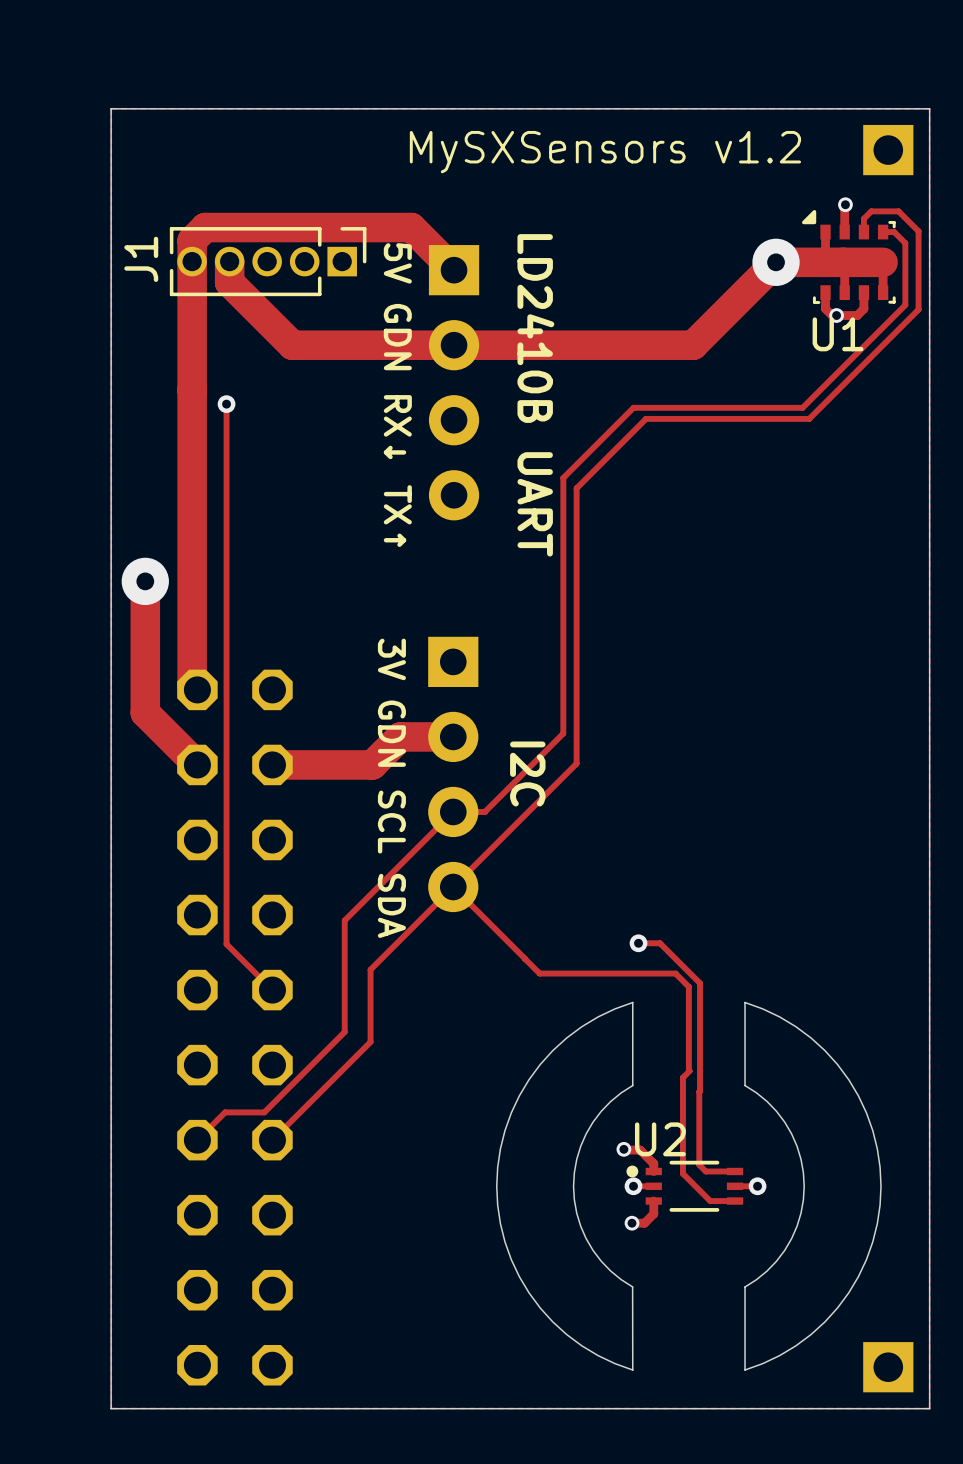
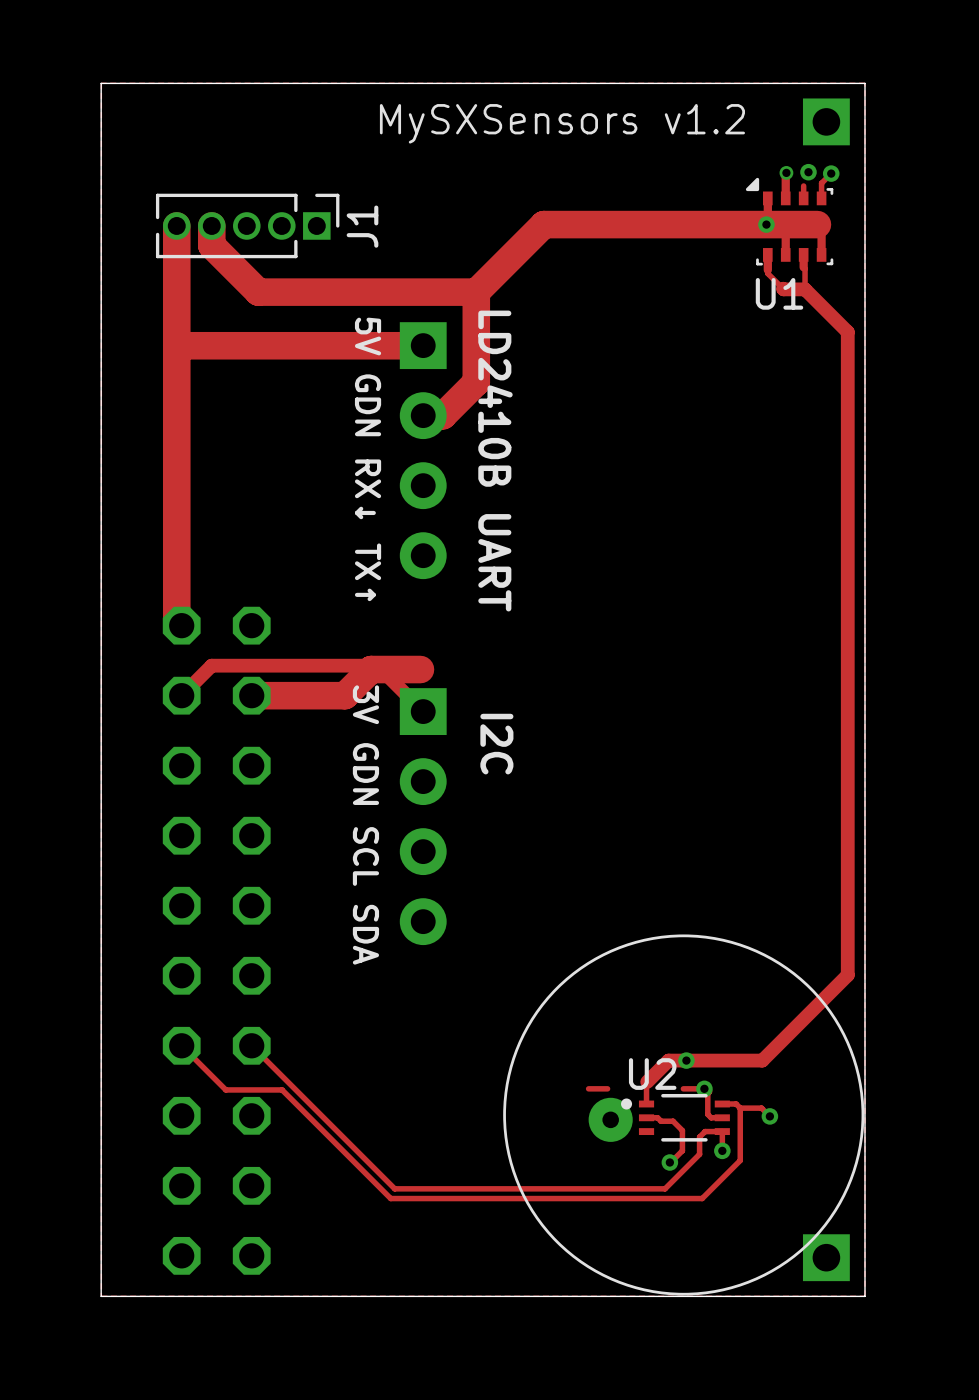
via: none -> (808, 172)
track: none -> (831, 173) (821, 183) (821, 198)
via: none -> (831, 173)
track: (863, 218) (871, 211) (898, 211) (918, 231) (918, 309) (809, 418) (646, 418) (576, 488) (576, 763) (370, 969) (370, 1042) (272, 1140) -> (722, 1150) (722, 1131) (705, 1131) (699, 1137) (699, 1154) (665, 1188) (394, 1188) (251, 1045)
track: (883, 232) (894, 232) (905, 243) (905, 305) (802, 407) (633, 407) (563, 477) (563, 733) (484, 811) (453, 811) (344, 920) (344, 1032) (264, 1112) (225, 1112) (197, 1140) -> (740, 1108) (740, 1160) (702, 1198) (390, 1198) (282, 1089) (225, 1089) (181, 1045)
J1 name position: J1 (141, 259) -> J1 (362, 226)
via: none -> (766, 224)
track: (192, 261) (192, 240) (205, 227) (411, 227) (454, 270) -> none
via: (776, 262) -> none
track: (883, 264) (883, 262) (776, 262) (693, 345) (292, 345) (279, 332) -> (821, 228) (817, 224) (543, 224) (476, 292)
track: (863, 305) (863, 308) (857, 315) (832, 315) (825, 308) -> (805, 289) (783, 289) (767, 273) (767, 270)
track: none -> (803, 267) (805, 289)
via: (836, 315) -> none
track: none -> (805, 289) (847, 332) (847, 975) (762, 1060) (668, 1060) (646, 1082) (646, 1104)
track: none -> (258, 292) (476, 292)
track: none -> (476, 292) (476, 382) (442, 415) (421, 415)
part position: (454, 382) -> (423, 450)
track: none -> (423, 345) (176, 345)
text position: 5V GDN RX↓ TX↑ (397, 395) -> 5V GDN RX↓ TX↑ (368, 459)
text position: LD2410B UART (535, 395) -> LD2410B UART (495, 461)
track: (226, 404) (226, 944) (272, 990) -> none
via: (226, 404) -> none
track: (145, 581) (145, 712) (197, 764) -> (423, 711) (377, 665) (211, 665) (181, 695)
via: (145, 581) -> none
text position: I2C (527, 773) -> I2C (496, 744)
part position: (453, 774) -> (423, 816)
text position: 3V GDN SCL SDA (391, 788) -> 3V GDN SCL SDA (365, 824)
track: (453, 887) (539, 973) (675, 973) (688, 986) (689, 1071) (682, 1077) (682, 1173) (710, 1201) (735, 1201) -> none
track: (638, 943) (660, 943) (700, 983) (699, 1164) (705, 1171) (735, 1171) -> none
via: (638, 943) -> none
drawing: [496, 1001, 882, 1371] -> none
drawing: none -> [503, 934, 865, 1296]
track: (623, 1149) (640, 1150) (653, 1163) (653, 1171) -> none
via: (623, 1149) -> none
via: none -> (686, 1060)
via: (633, 1186) -> none
U2 position: (684, 1186) -> (675, 1117)
track: none -> (709, 1089) (707, 1114) (711, 1117) (722, 1117)
track: (653, 1201) (653, 1213) (644, 1223) (632, 1223) -> none
track: none -> (722, 1104) (736, 1104) (740, 1108)
track: none -> (740, 1108) (761, 1108) (769, 1116)
via size: [624, 1215, 640, 1231] -> [588, 1097, 633, 1142]
via: none -> (769, 1116)
track: none -> (646, 1117) (657, 1117) (661, 1121) (673, 1121) (682, 1130) (682, 1150) (669, 1162)
via: none -> (722, 1150)
via: none -> (669, 1162)

